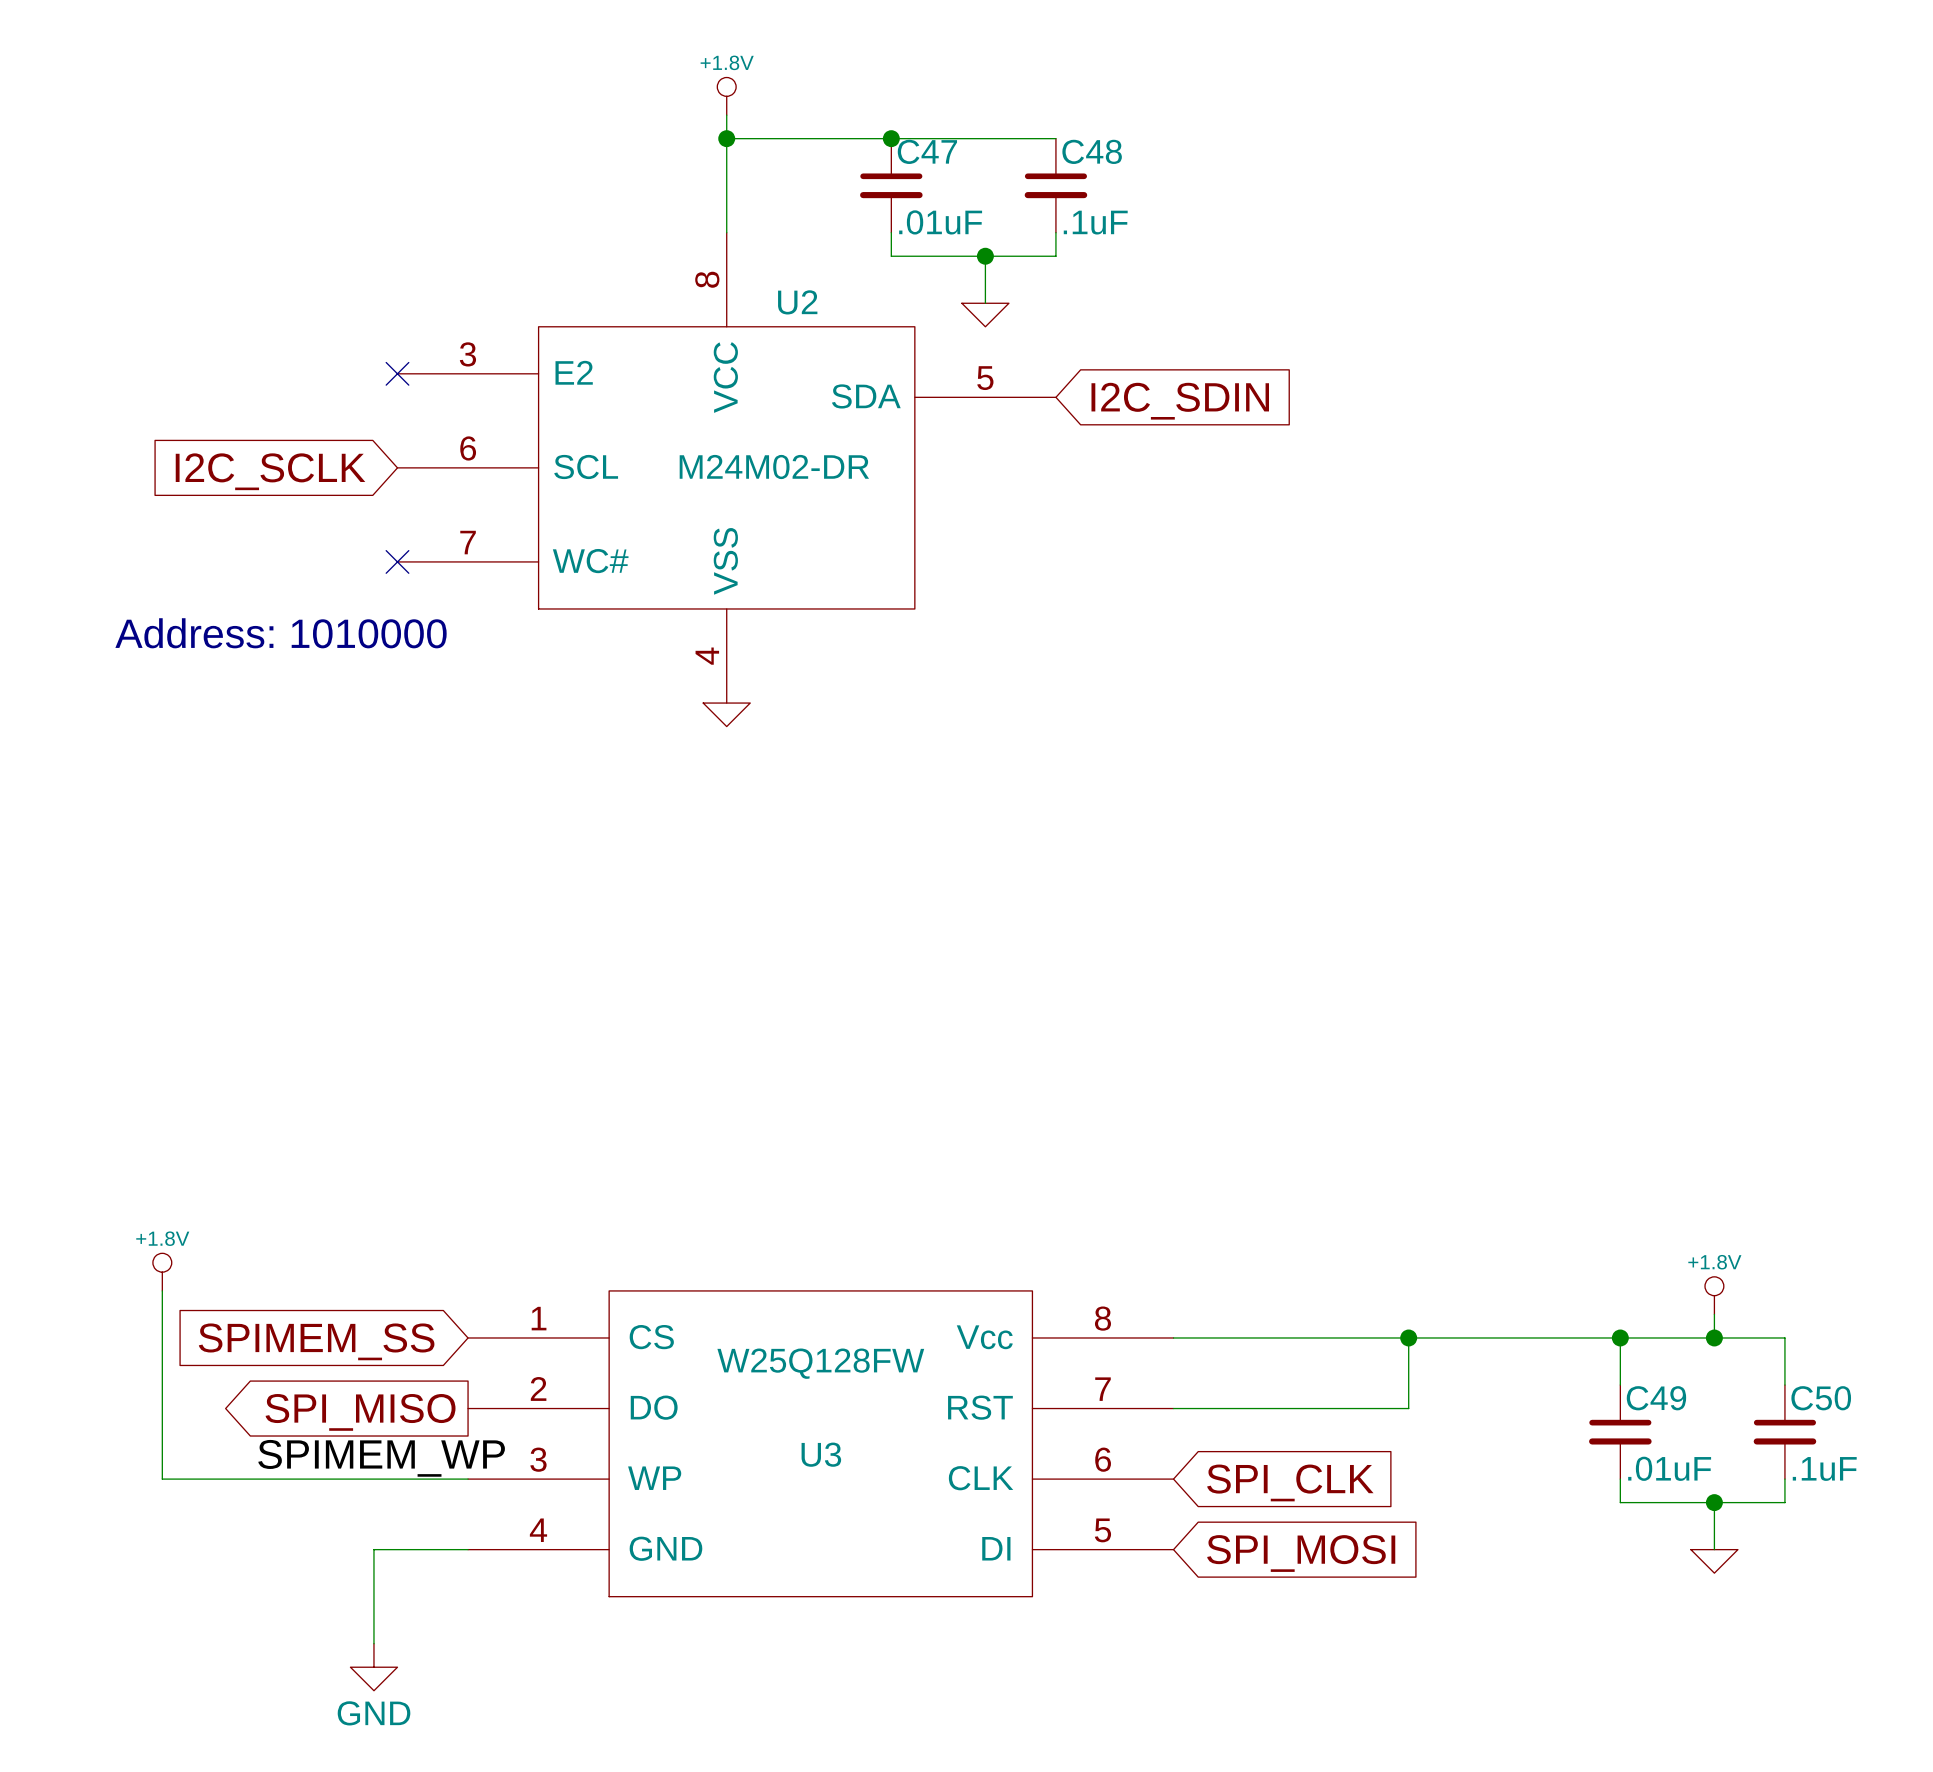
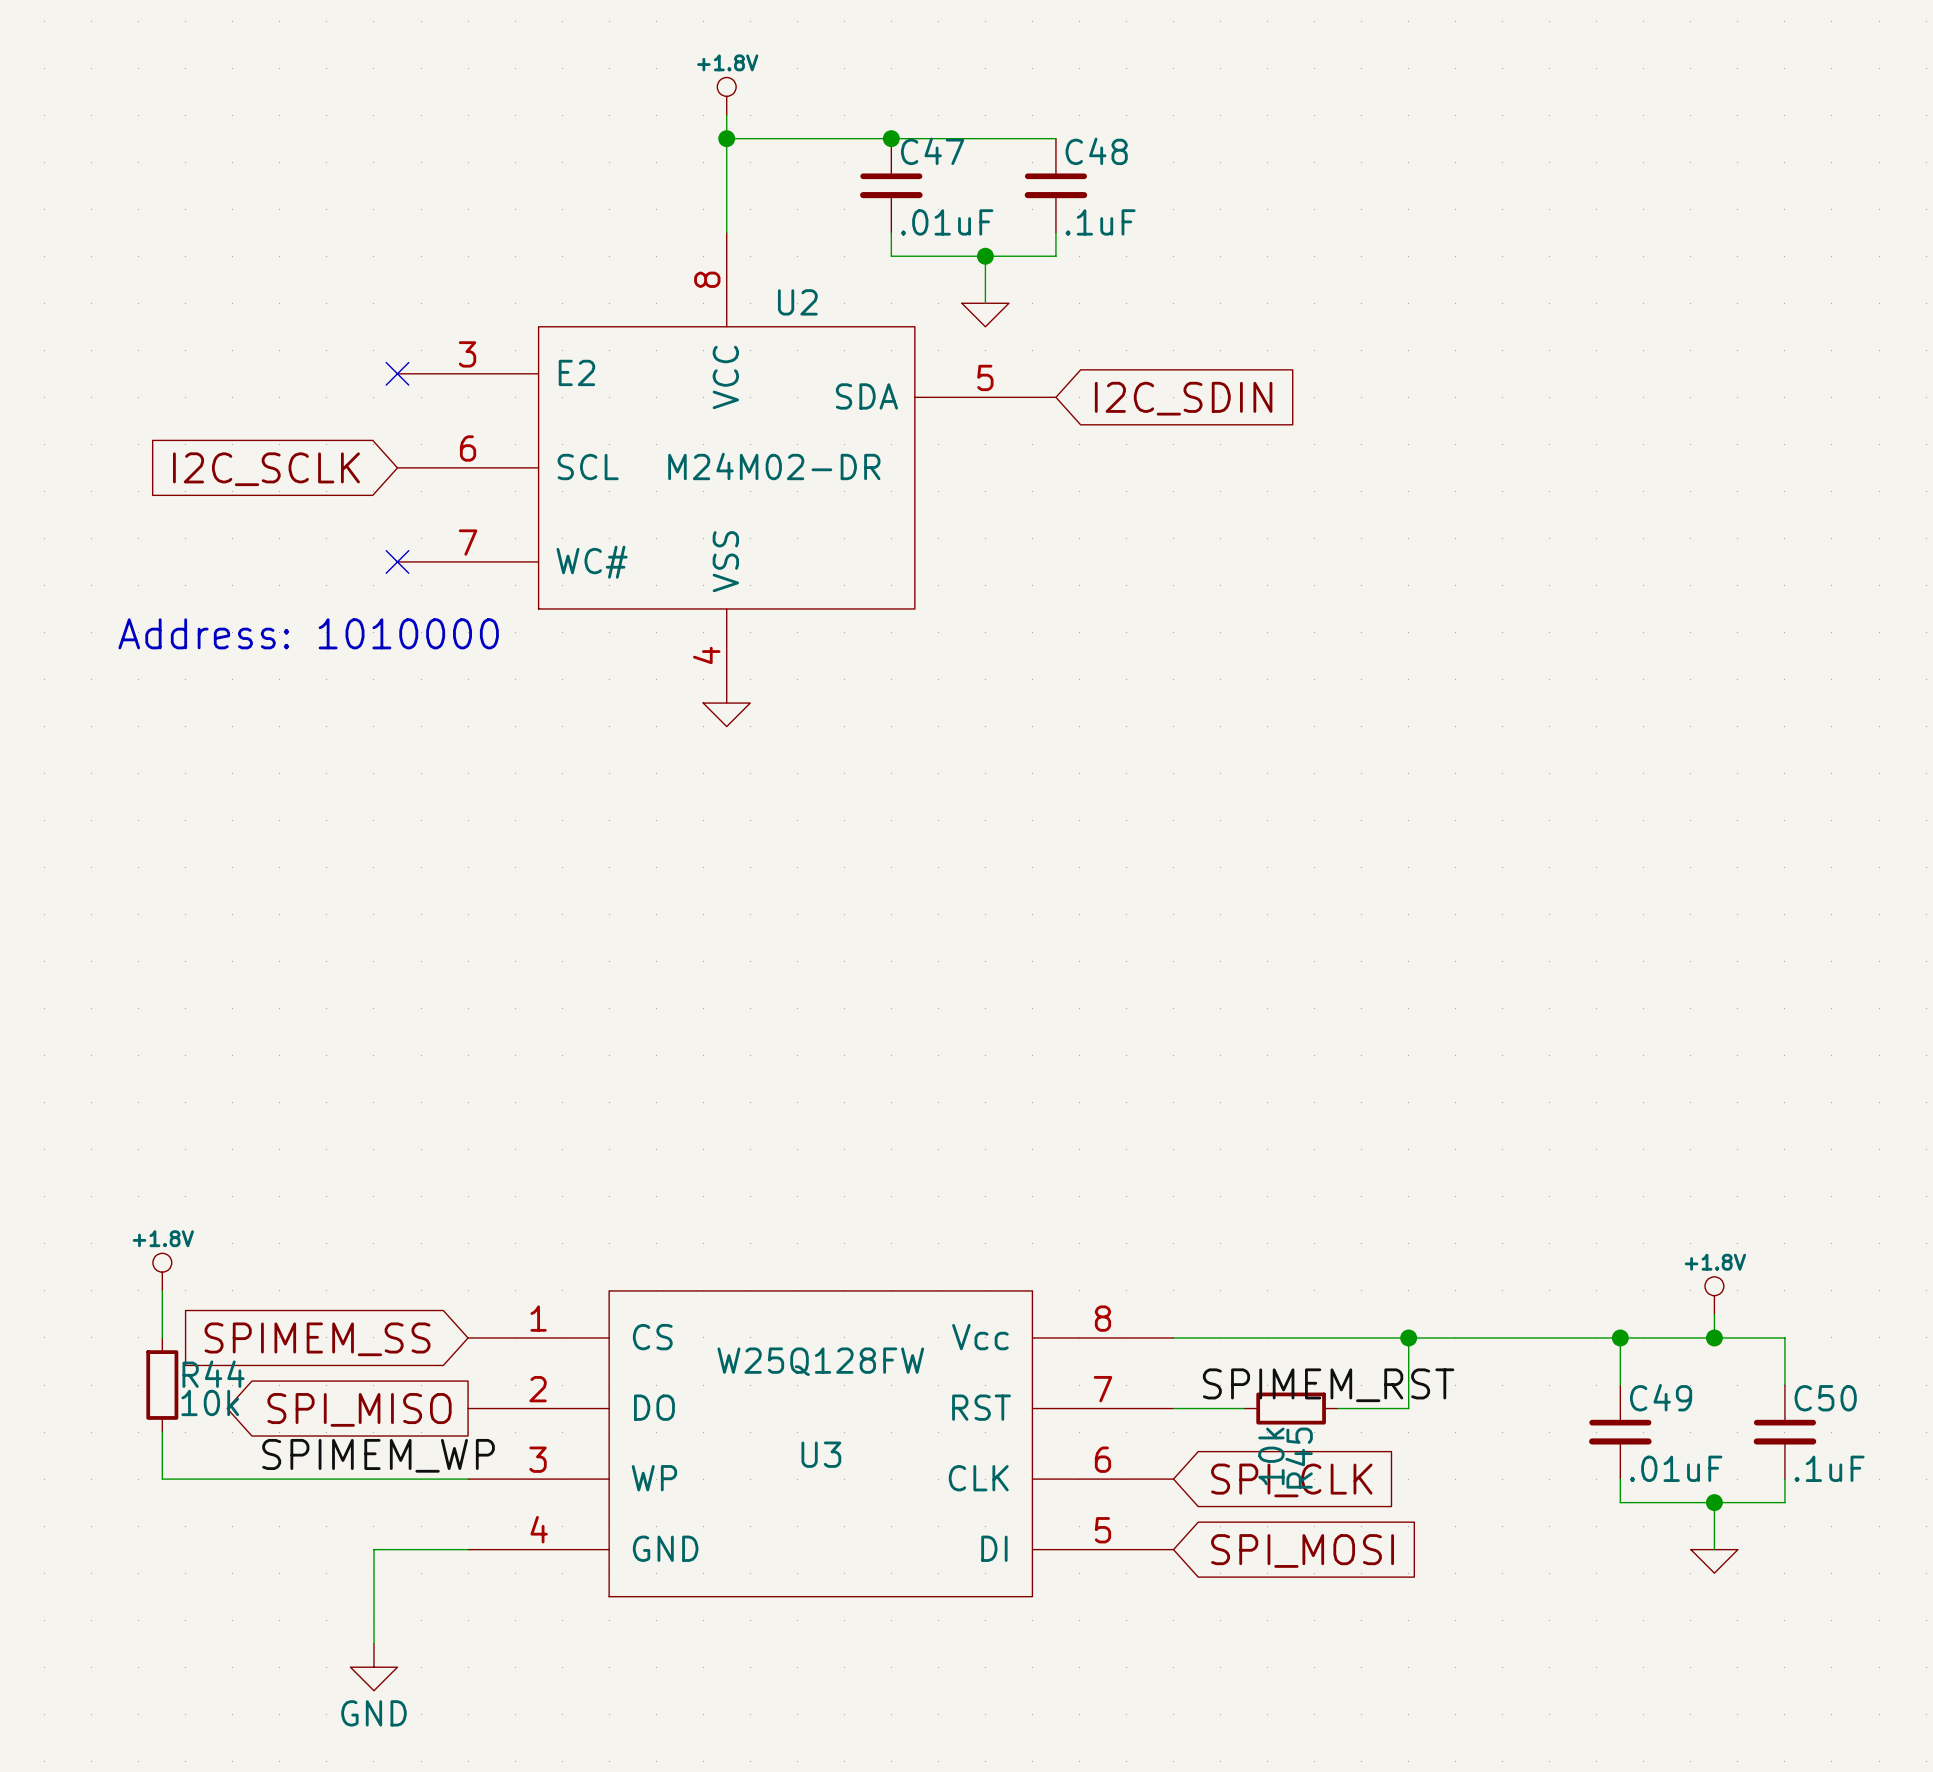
wire: (162, 1337) (162, 1432) -> none
R44: none -> 10k (162, 1385)
label: none -> SPIMEM_RST (1328, 1385)
wire: (1244, 1408) (1338, 1408) -> none
R45: none -> 10k (1291, 1408)

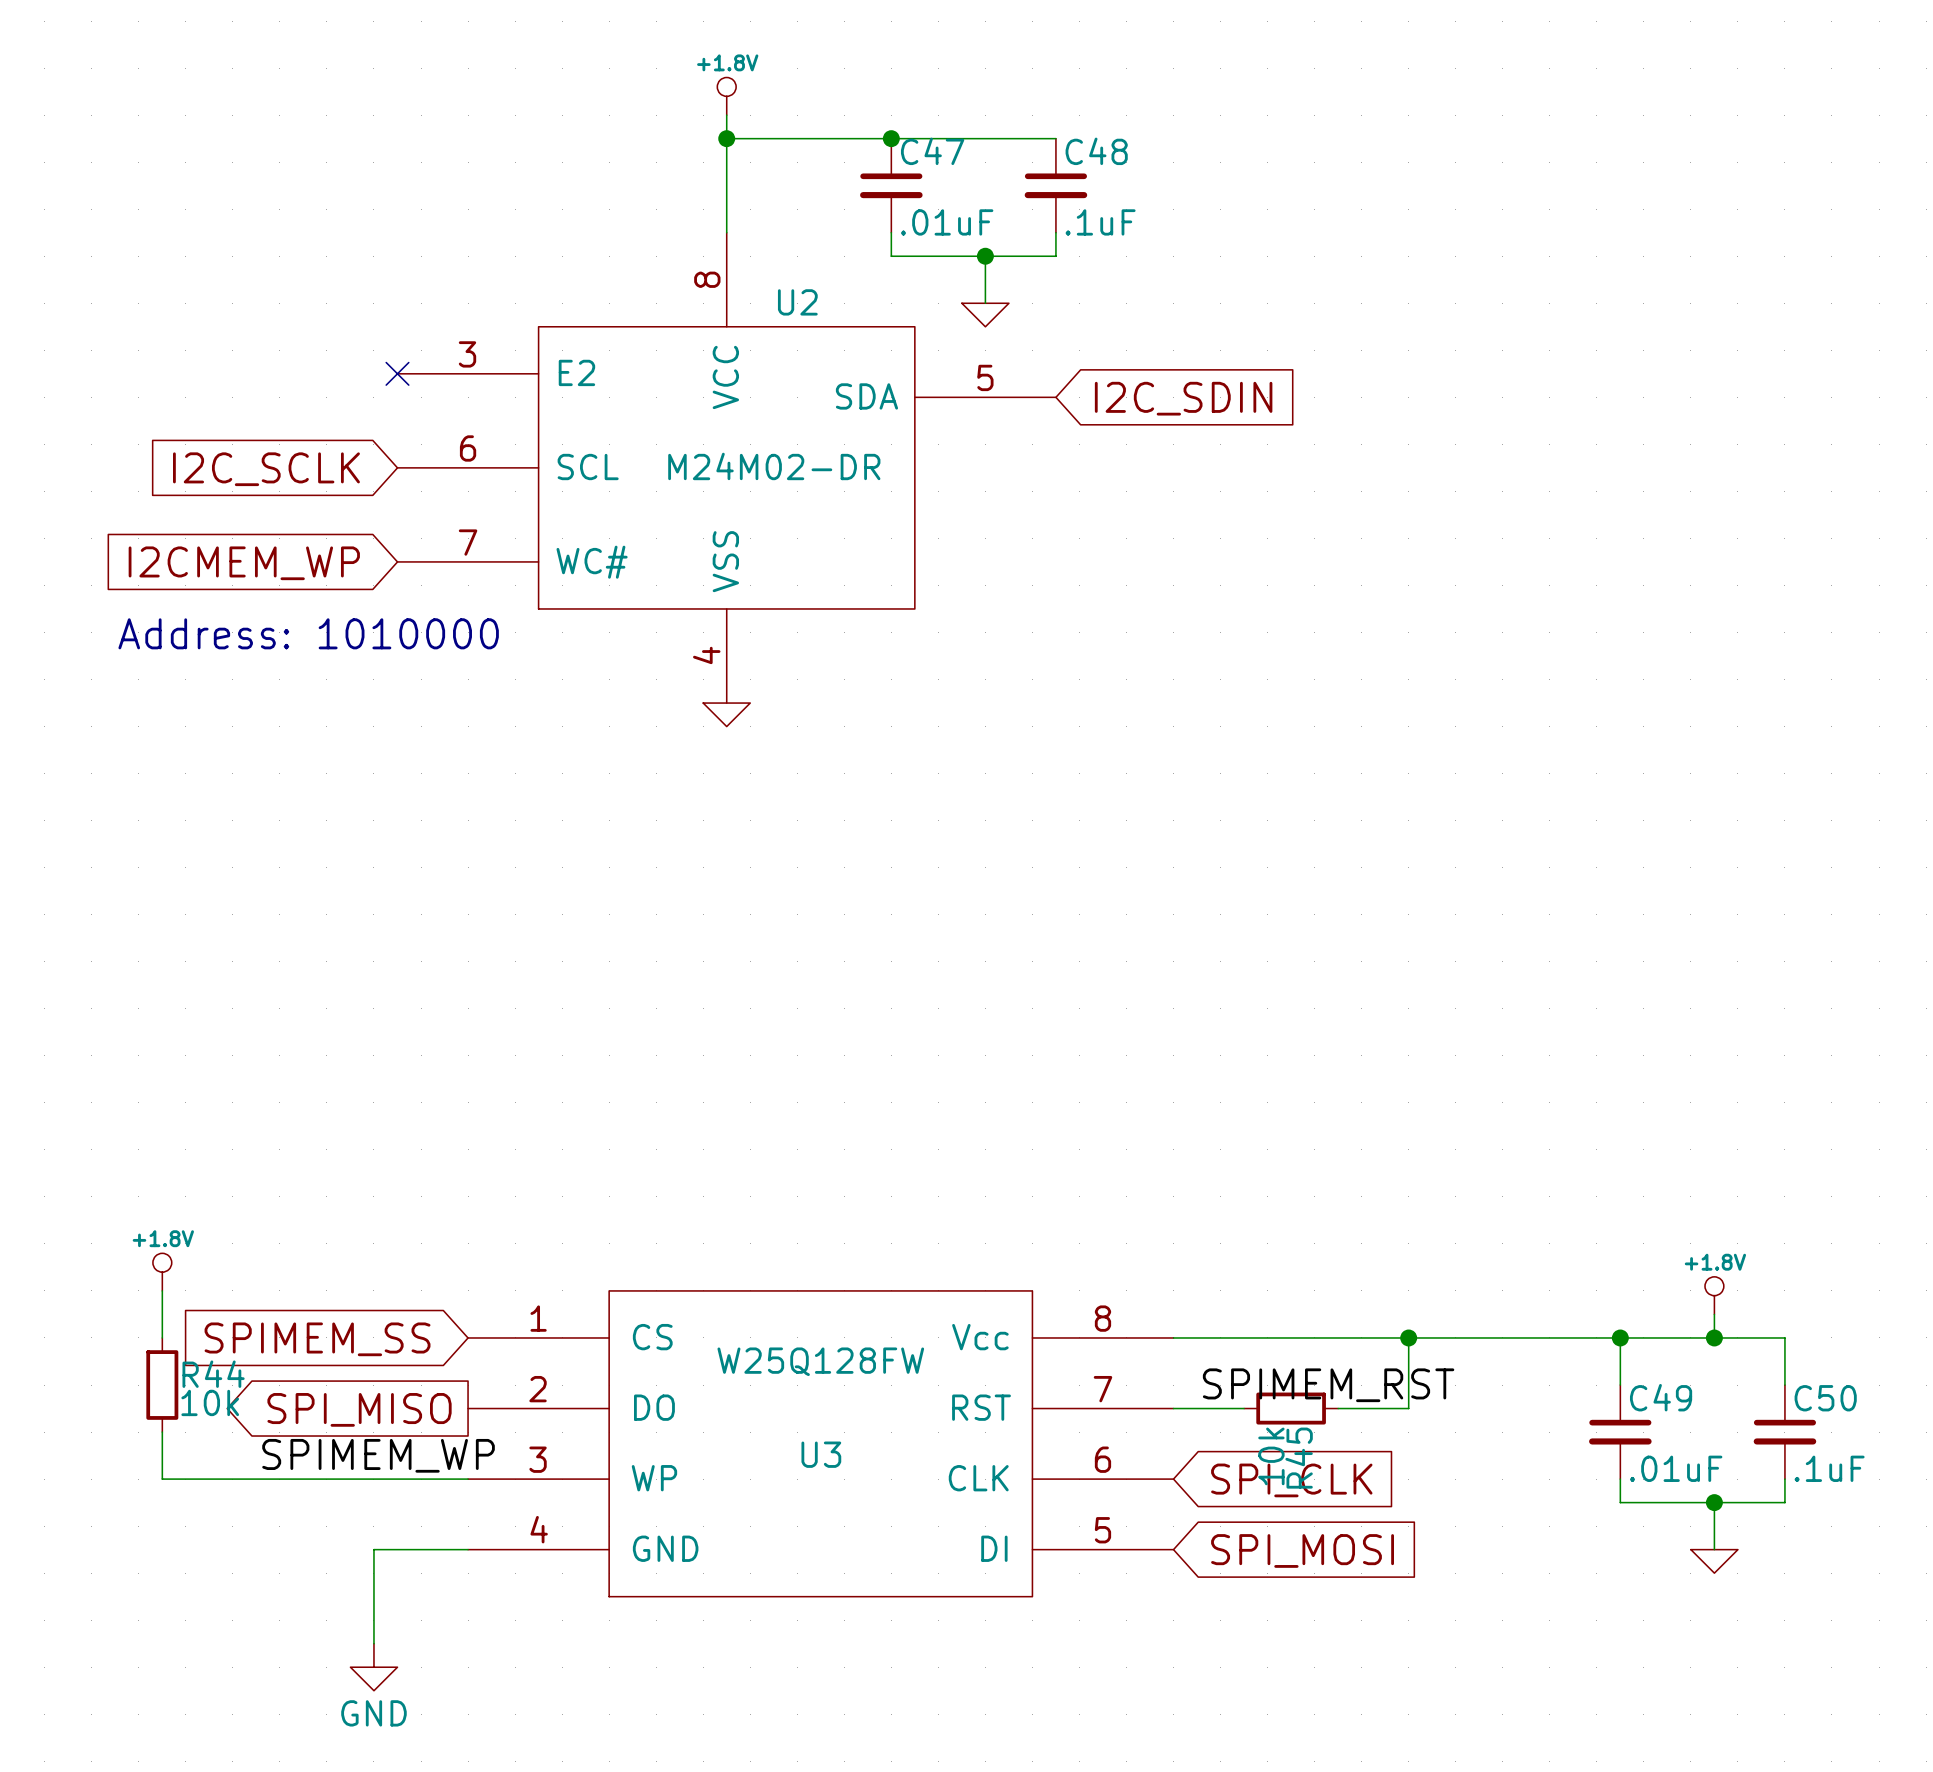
no-connect mark: (397, 561) -> none
global label: none -> I2CMEM_WP (244, 563)

